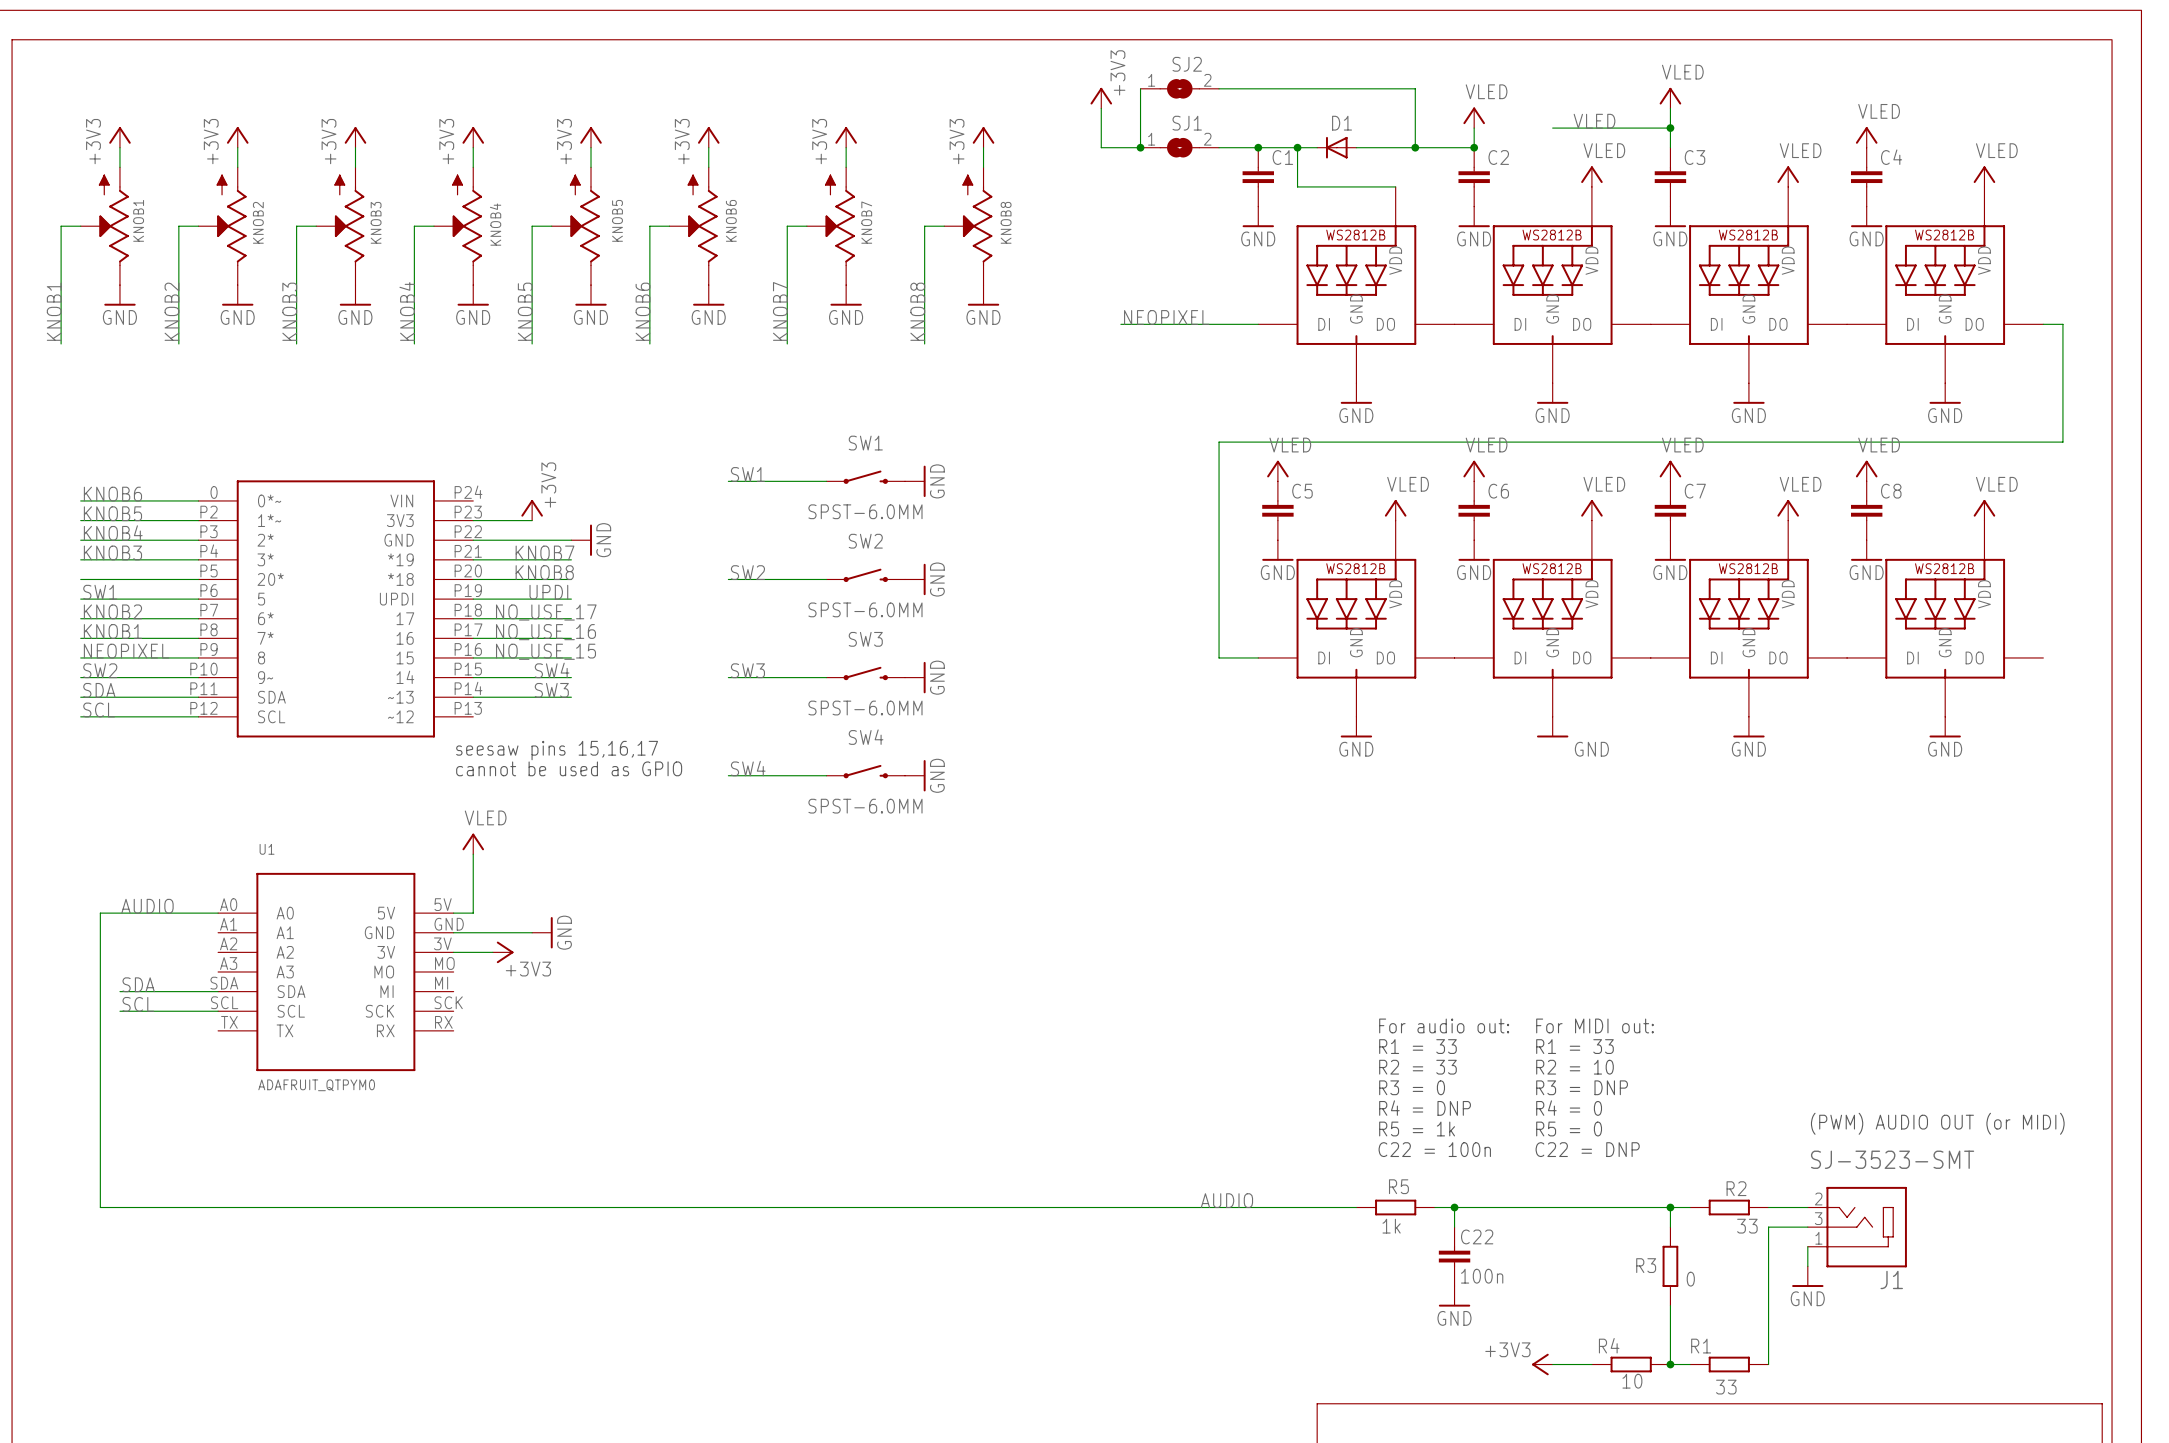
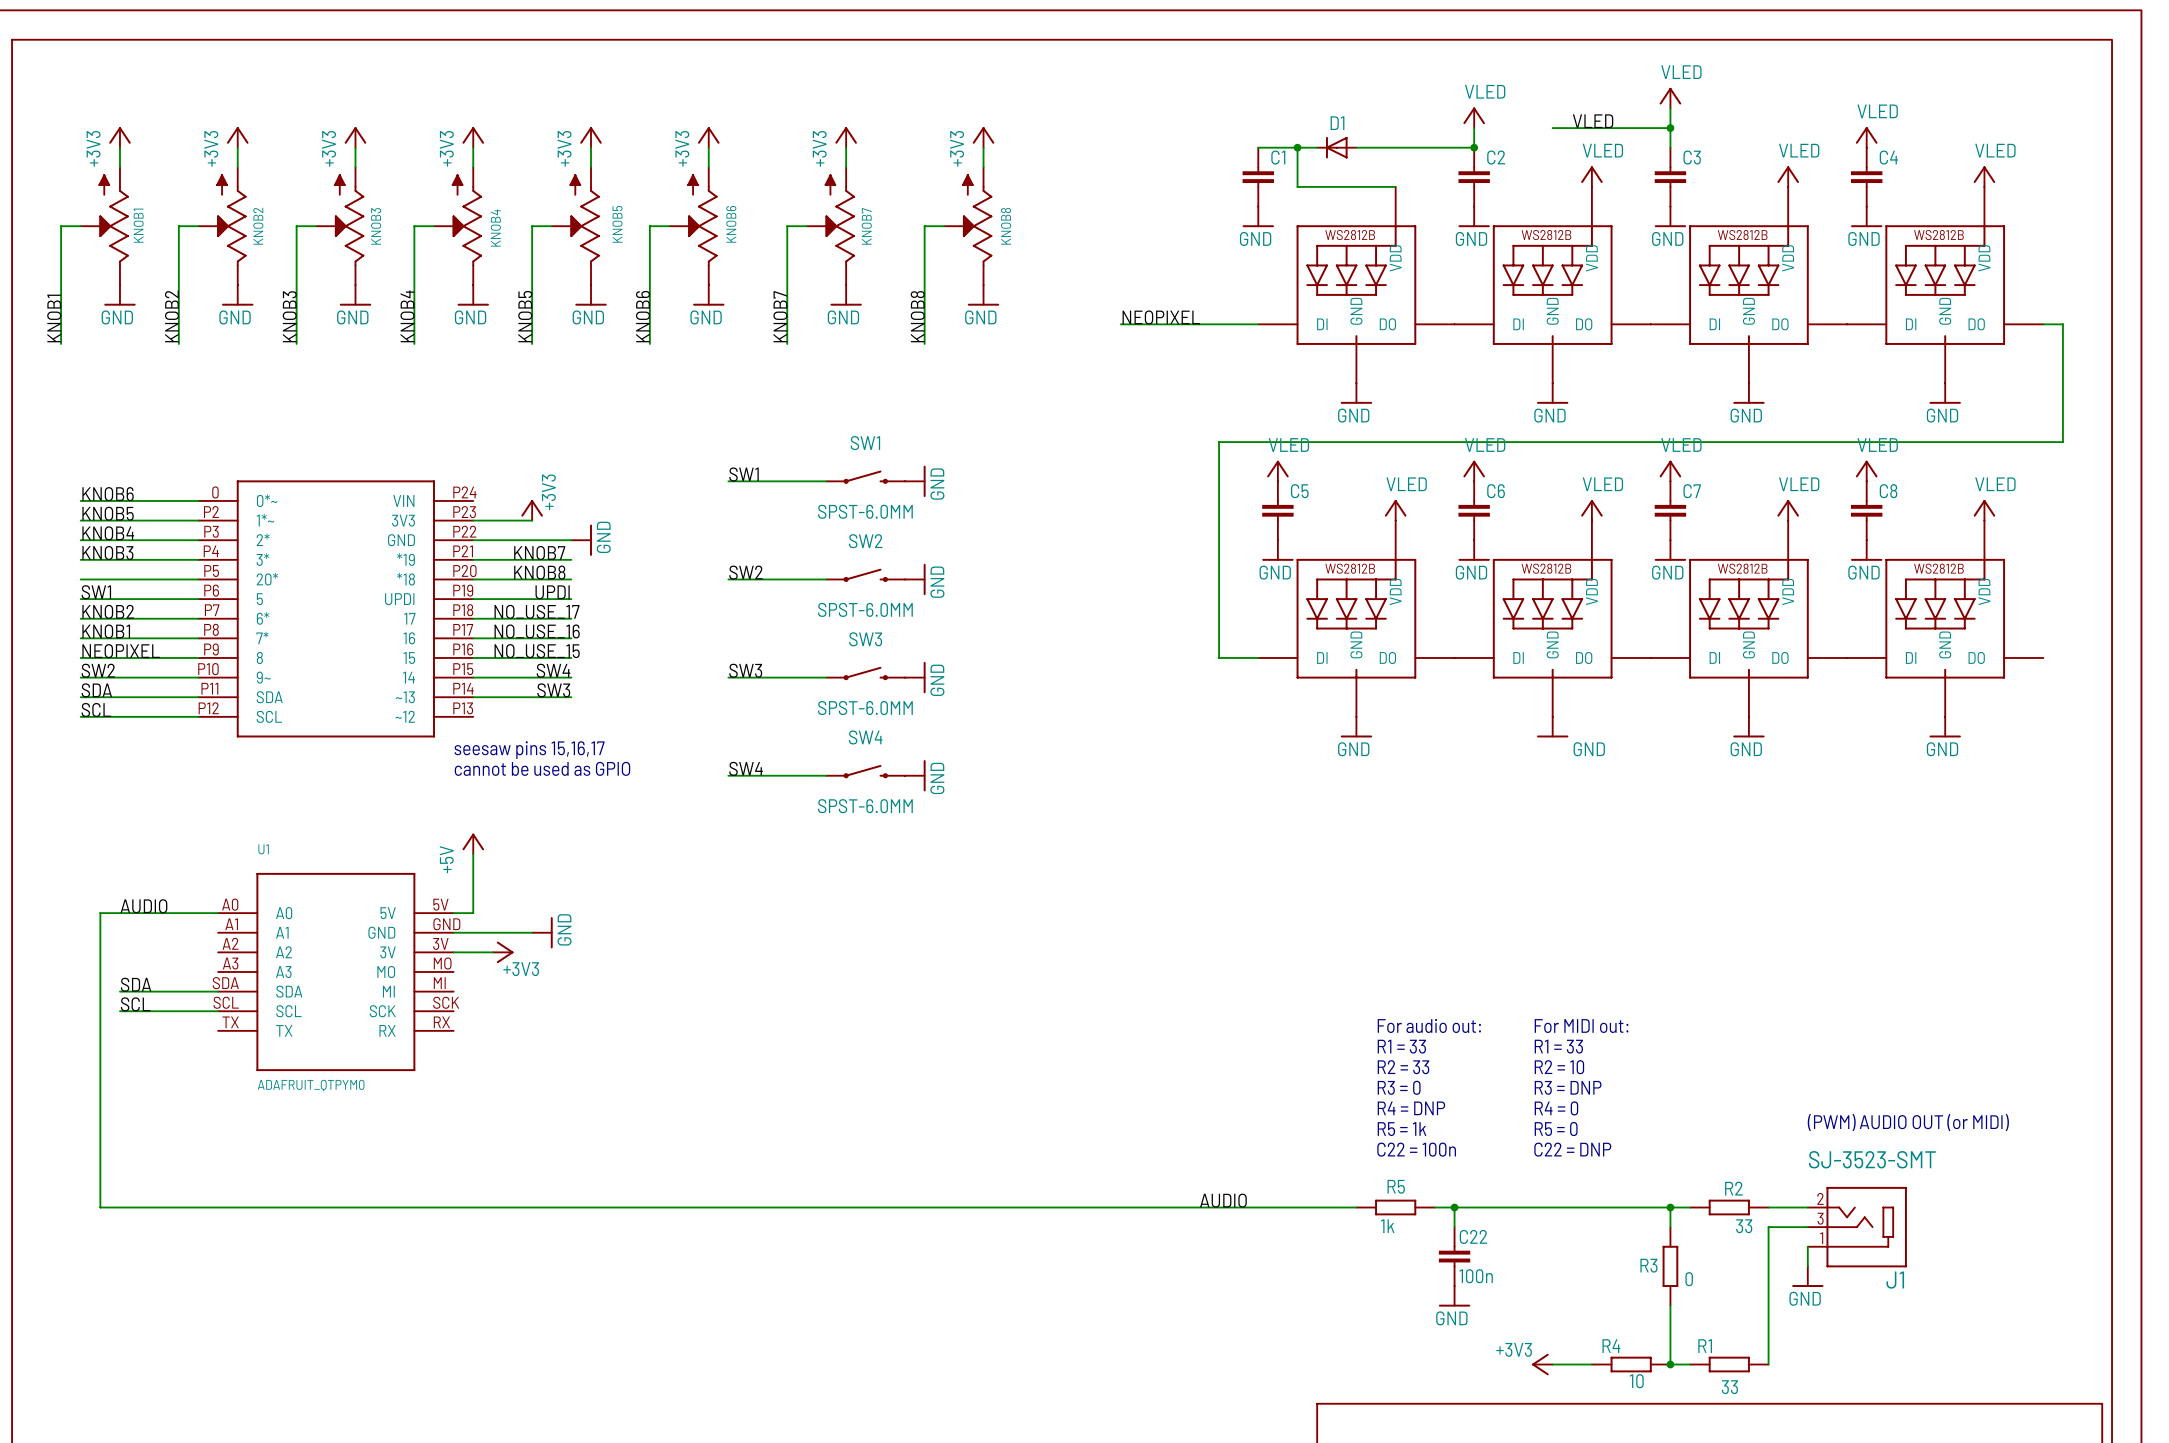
wire: (1140, 88) (1140, 147) (1101, 147) (1101, 108) -> none
SJ2: (1179, 88) -> none
wire: (1219, 88) (1415, 88) (1415, 147) -> none
power symbol: +3V3 (1101, 98) -> none
junction: (1140, 147) -> none
SJ1: (1179, 147) -> none
wire: (1219, 147) (1258, 147) -> none
junction: (1258, 147) -> none
junction: (1415, 147) -> none
power symbol: VLED (473, 843) -> +5V (473, 843)

